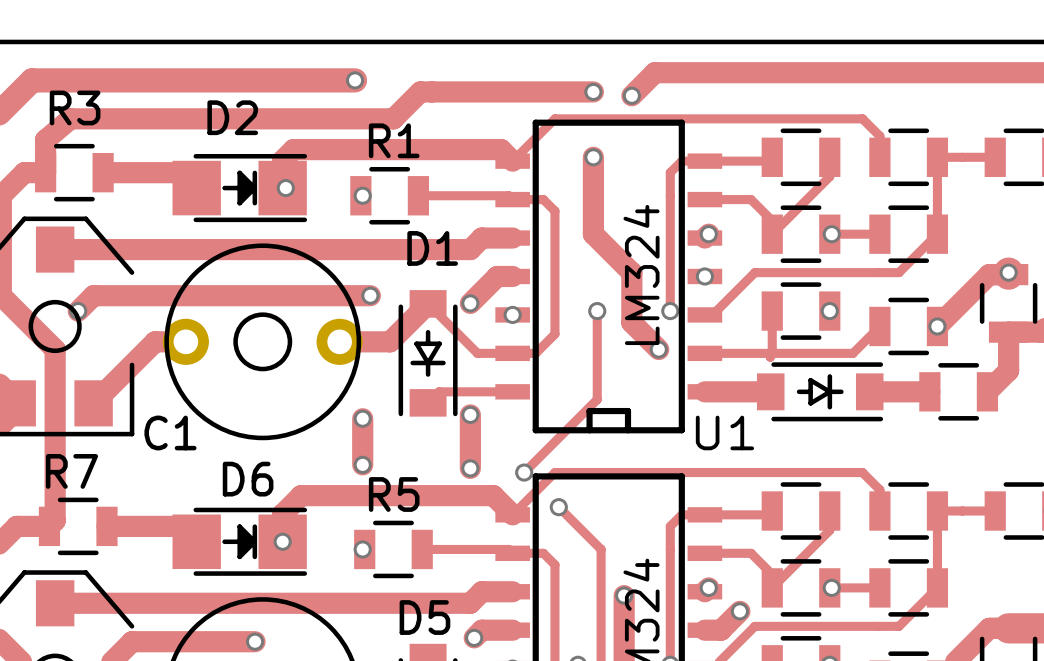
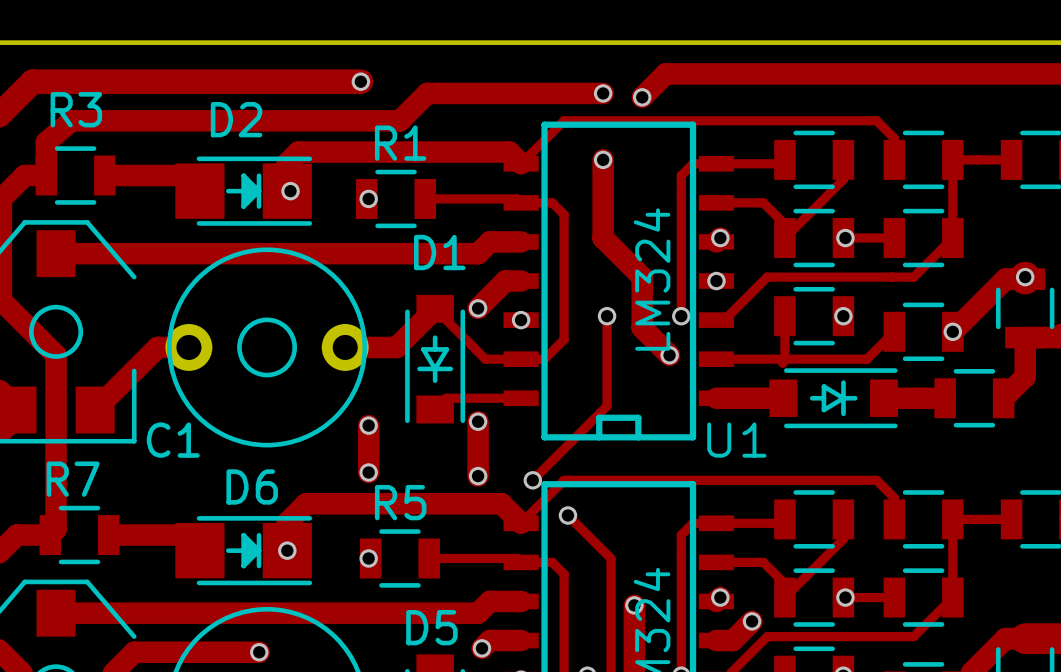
track: (370, 295) (93, 295) (78, 311) -> none
via: (370, 295) -> none
via: (78, 311) -> none

